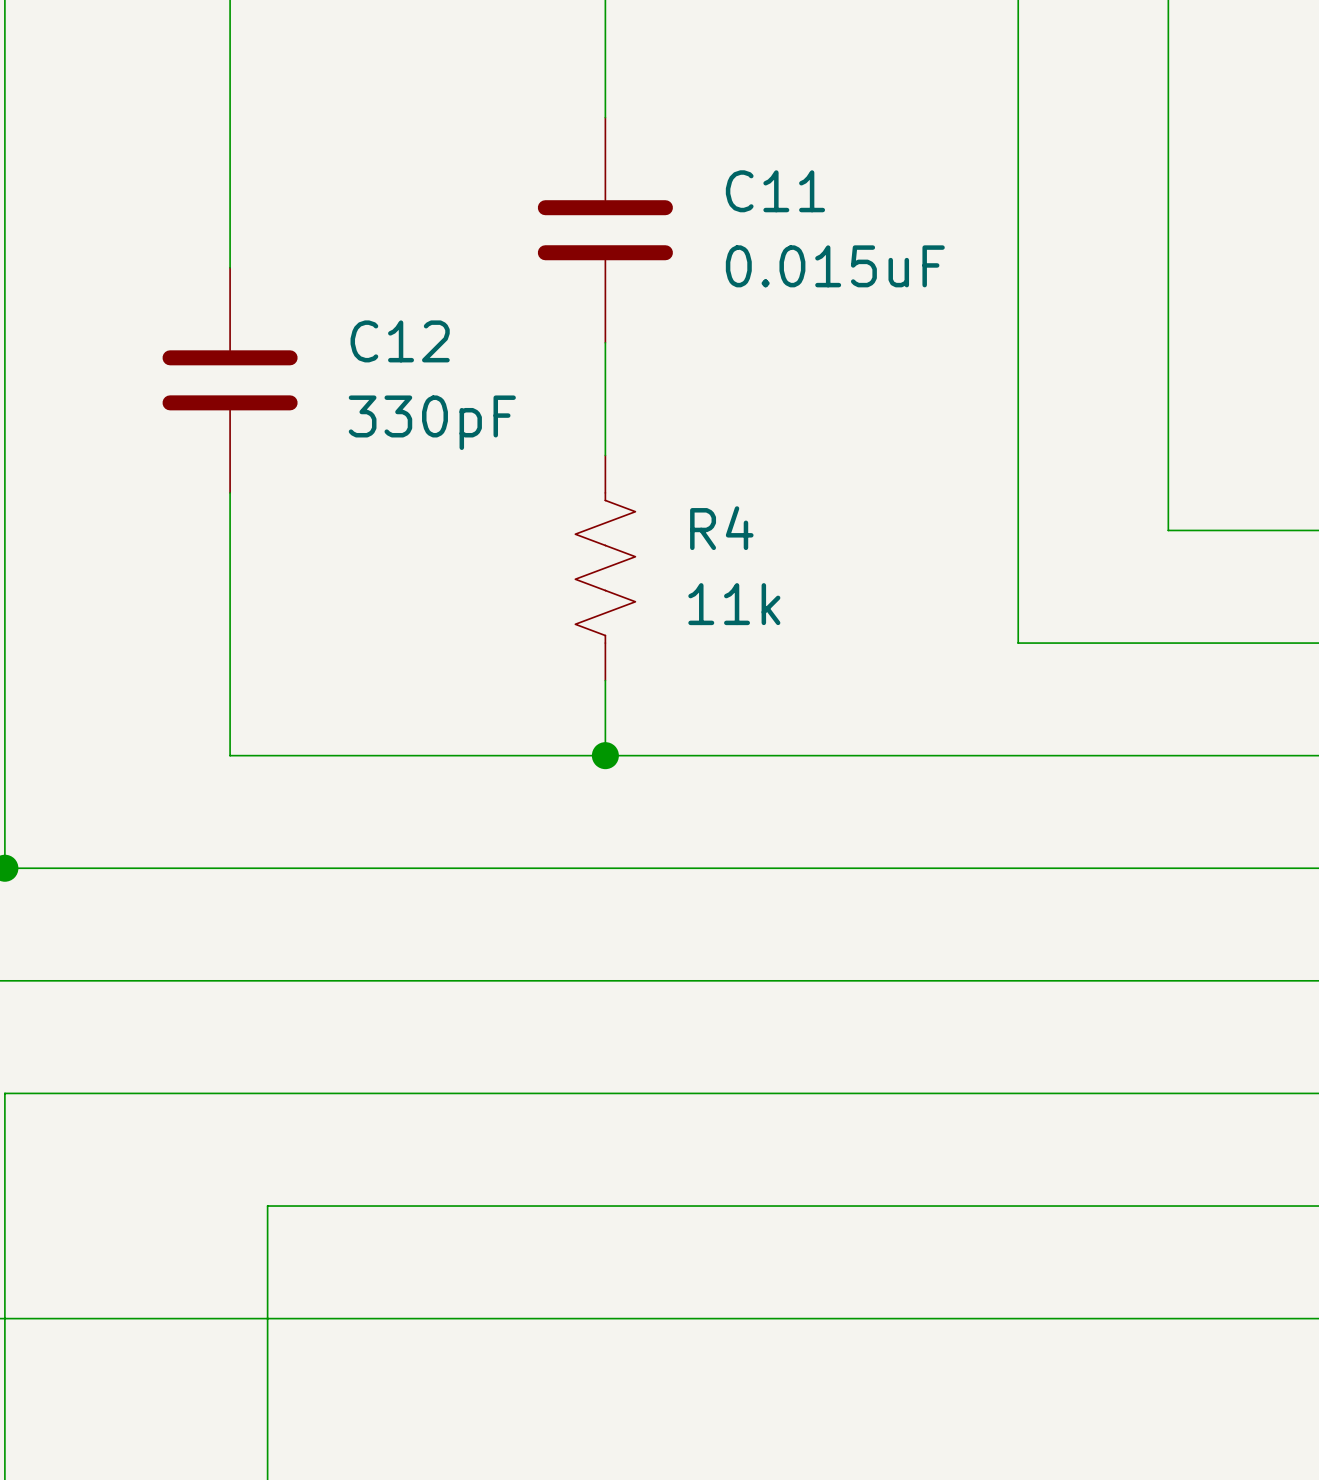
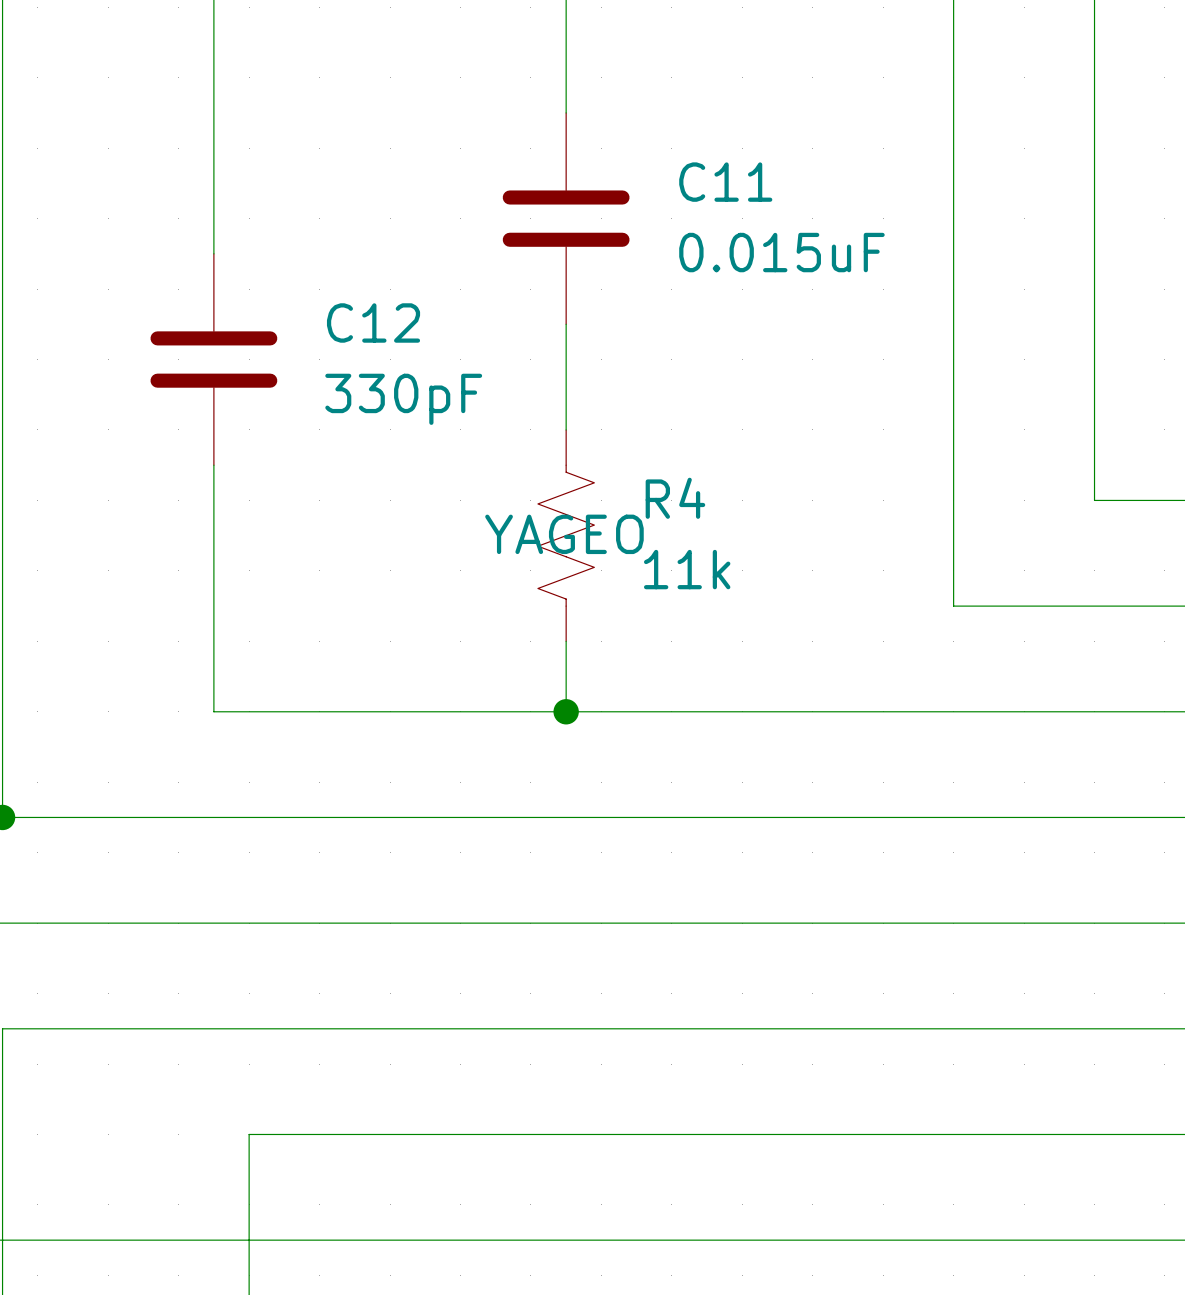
R4 text: none -> YAGEO (564, 534)

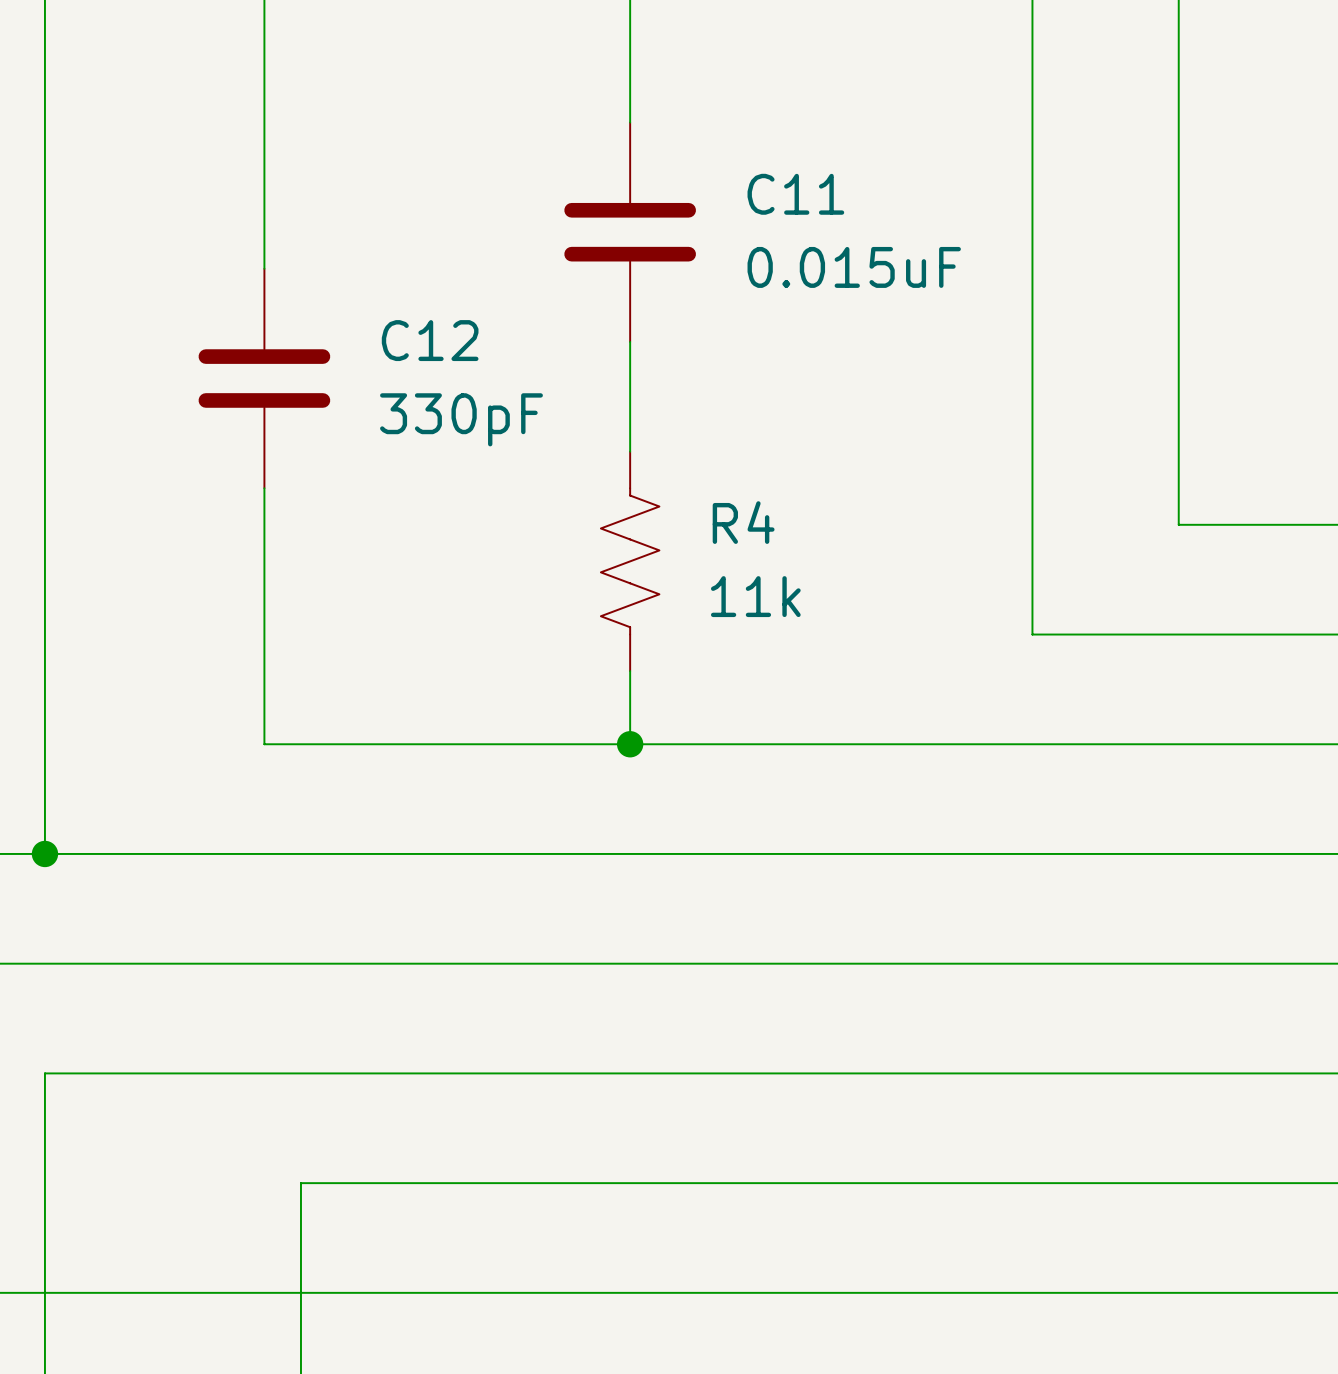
R4 text: YAGEO (564, 534) -> none

